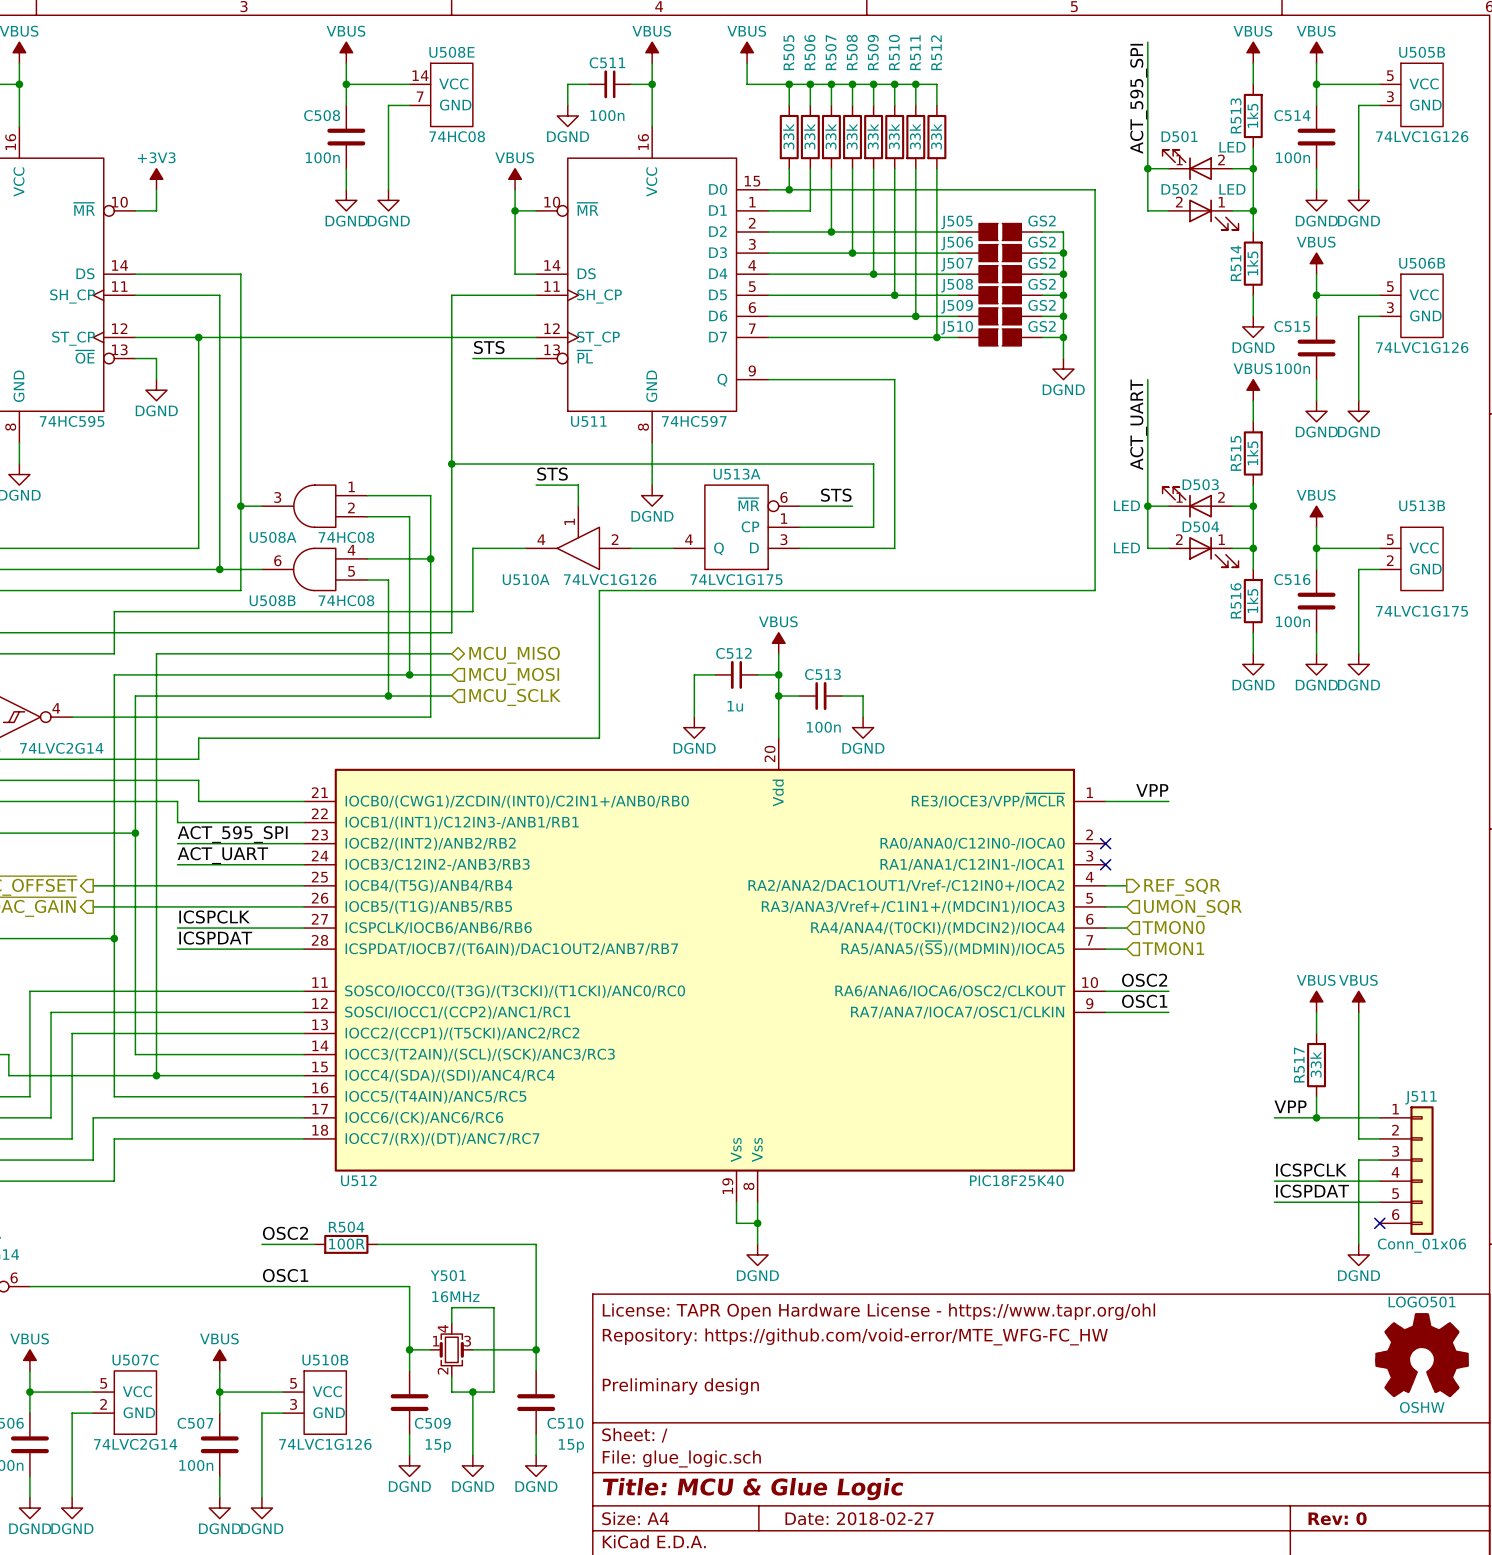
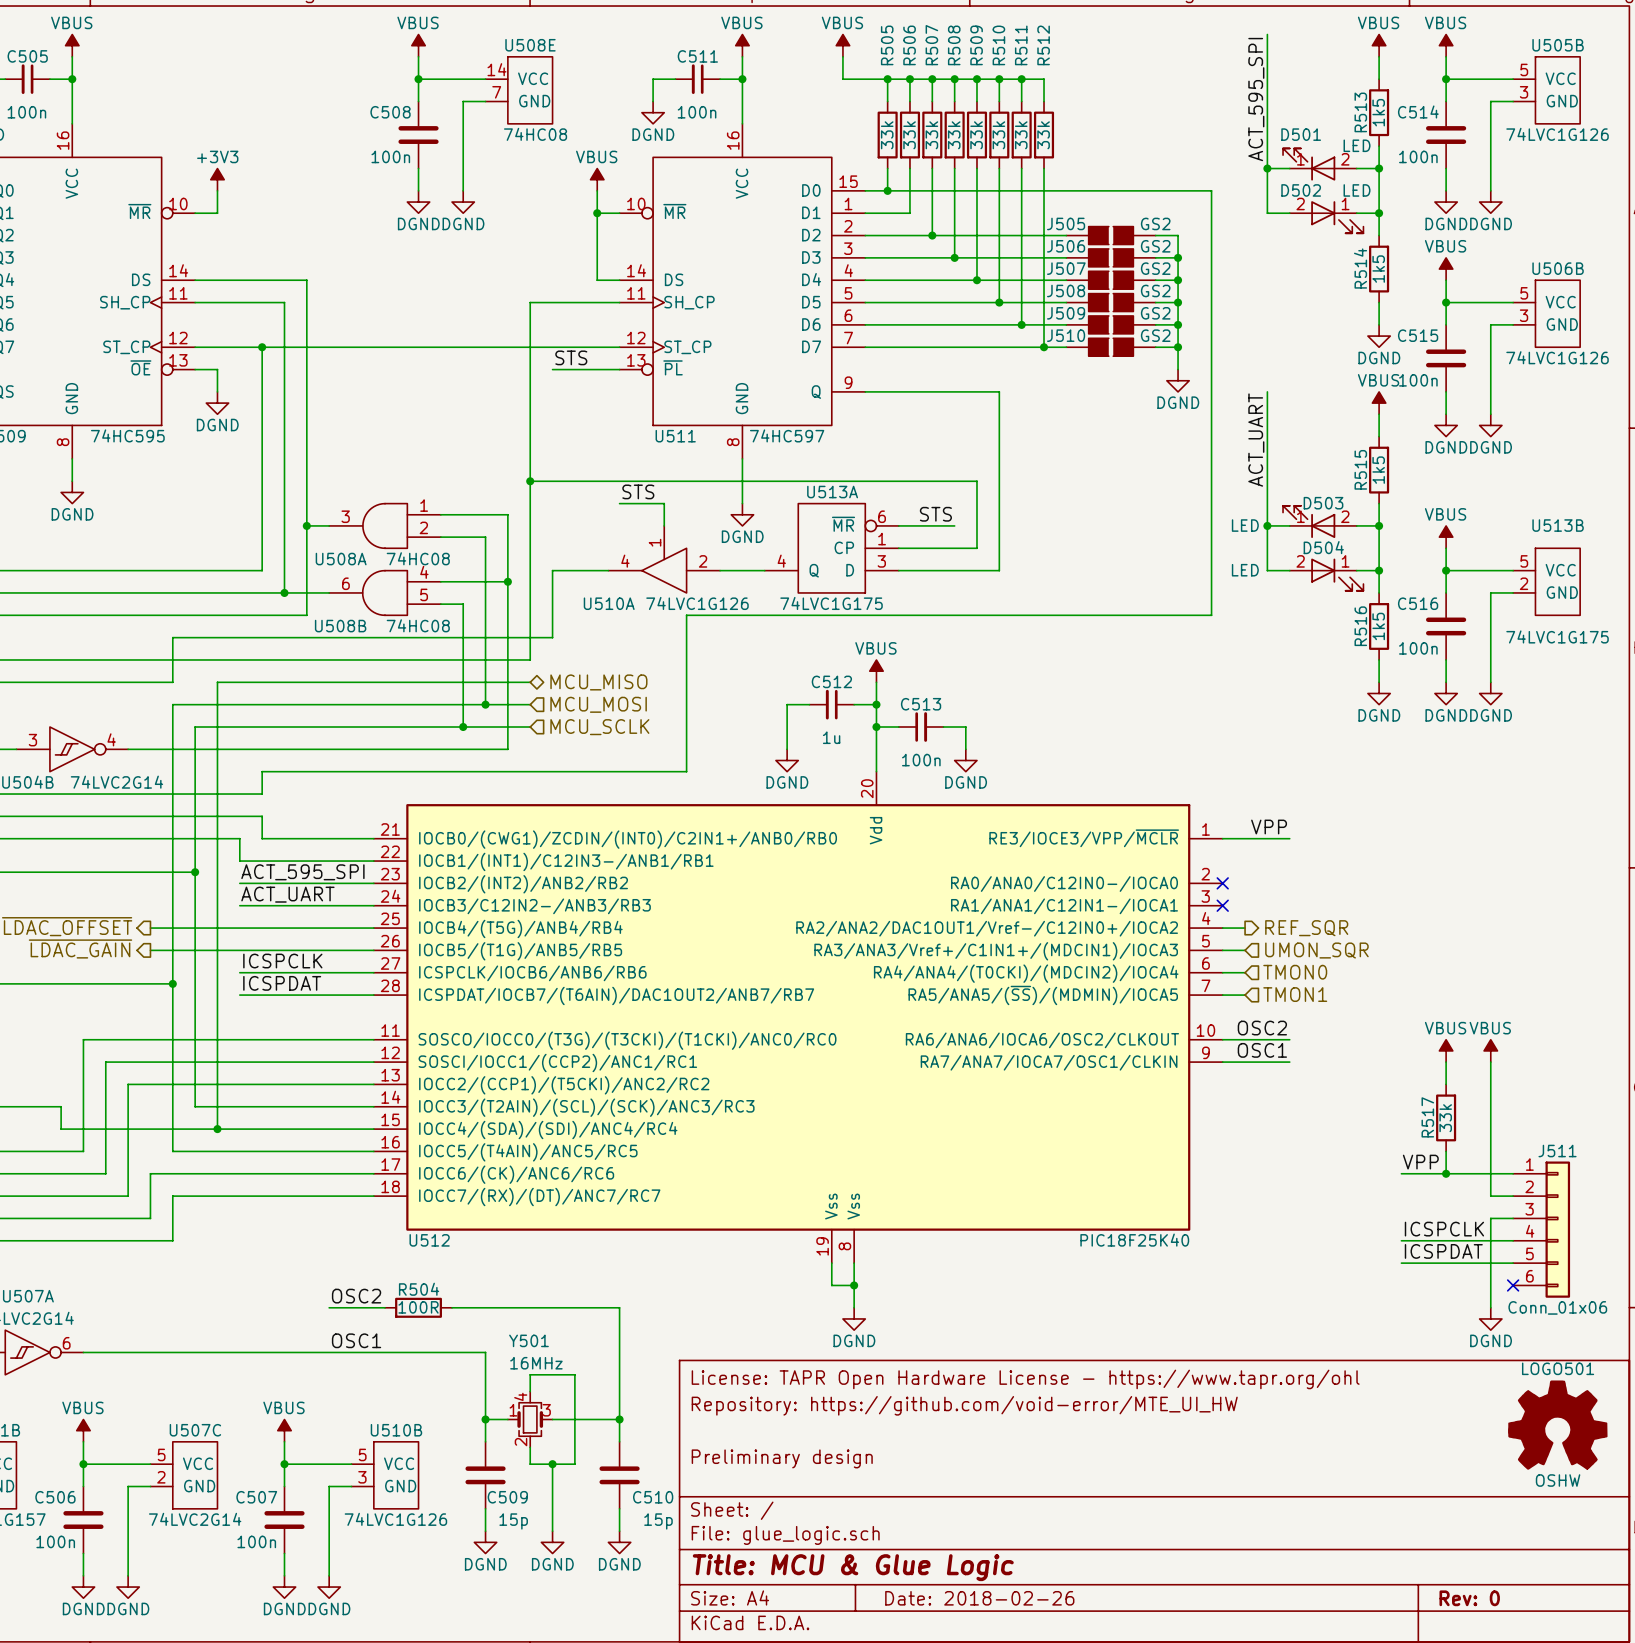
title block: Repository: https://github.com/void-error/MTE_WFG-FC_HW (855, 1336) -> Repository: https://github.com/void-error/MTE_UI_HW (964, 1405)
title block: Date: 2018-02-27 (859, 1518) -> Date: 2018-02-26 (979, 1598)

